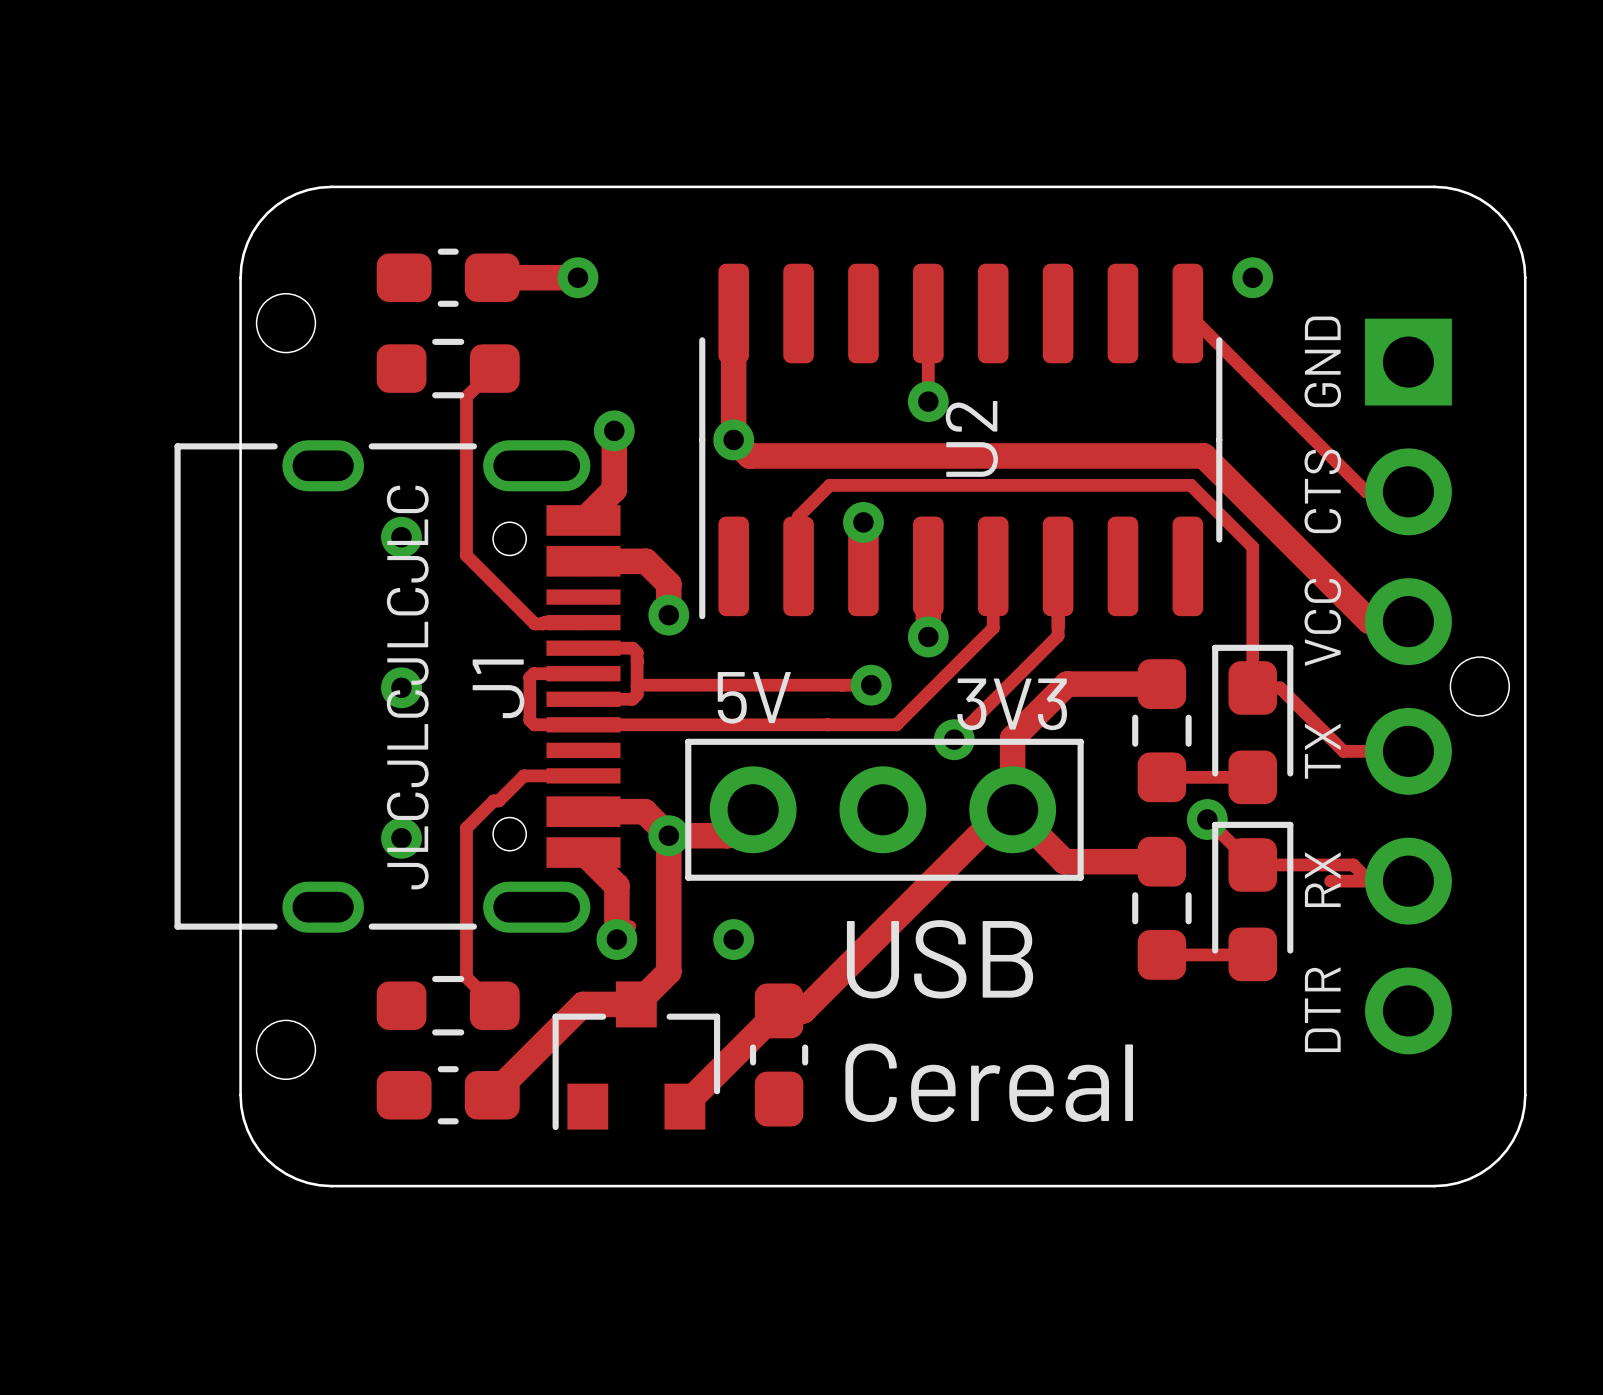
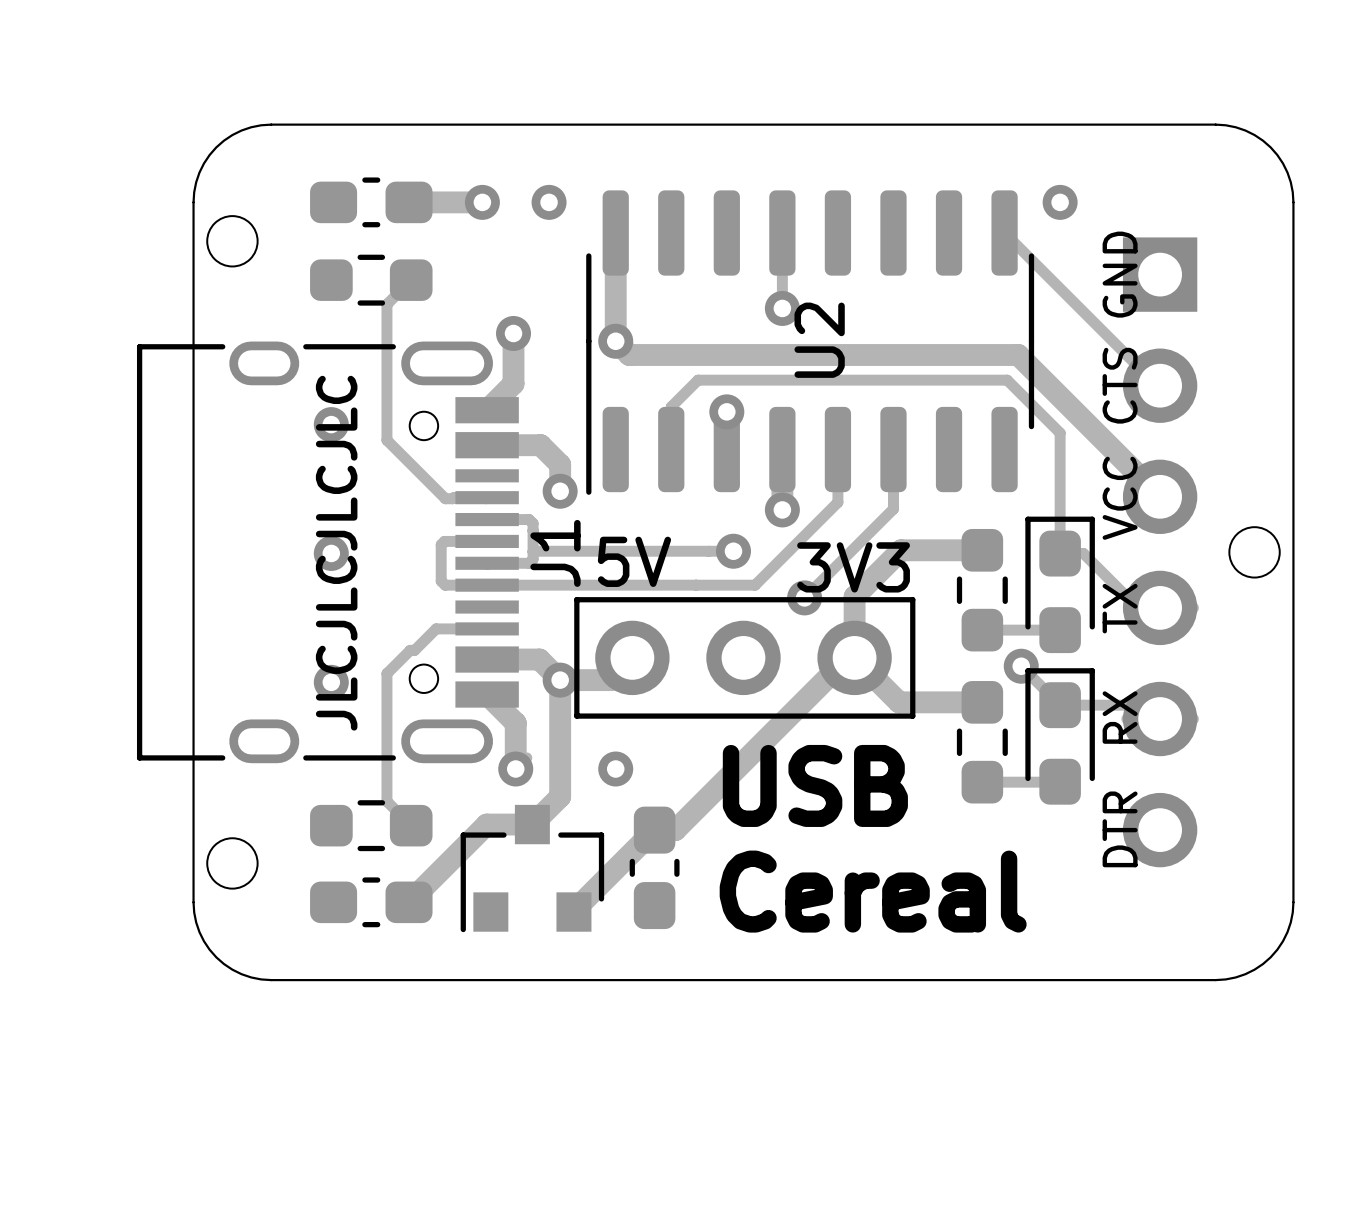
via: none -> (549, 202)
part position: (1408, 686) -> (1160, 552)
J1 name position: J1 (498, 688) -> J1 (555, 553)

